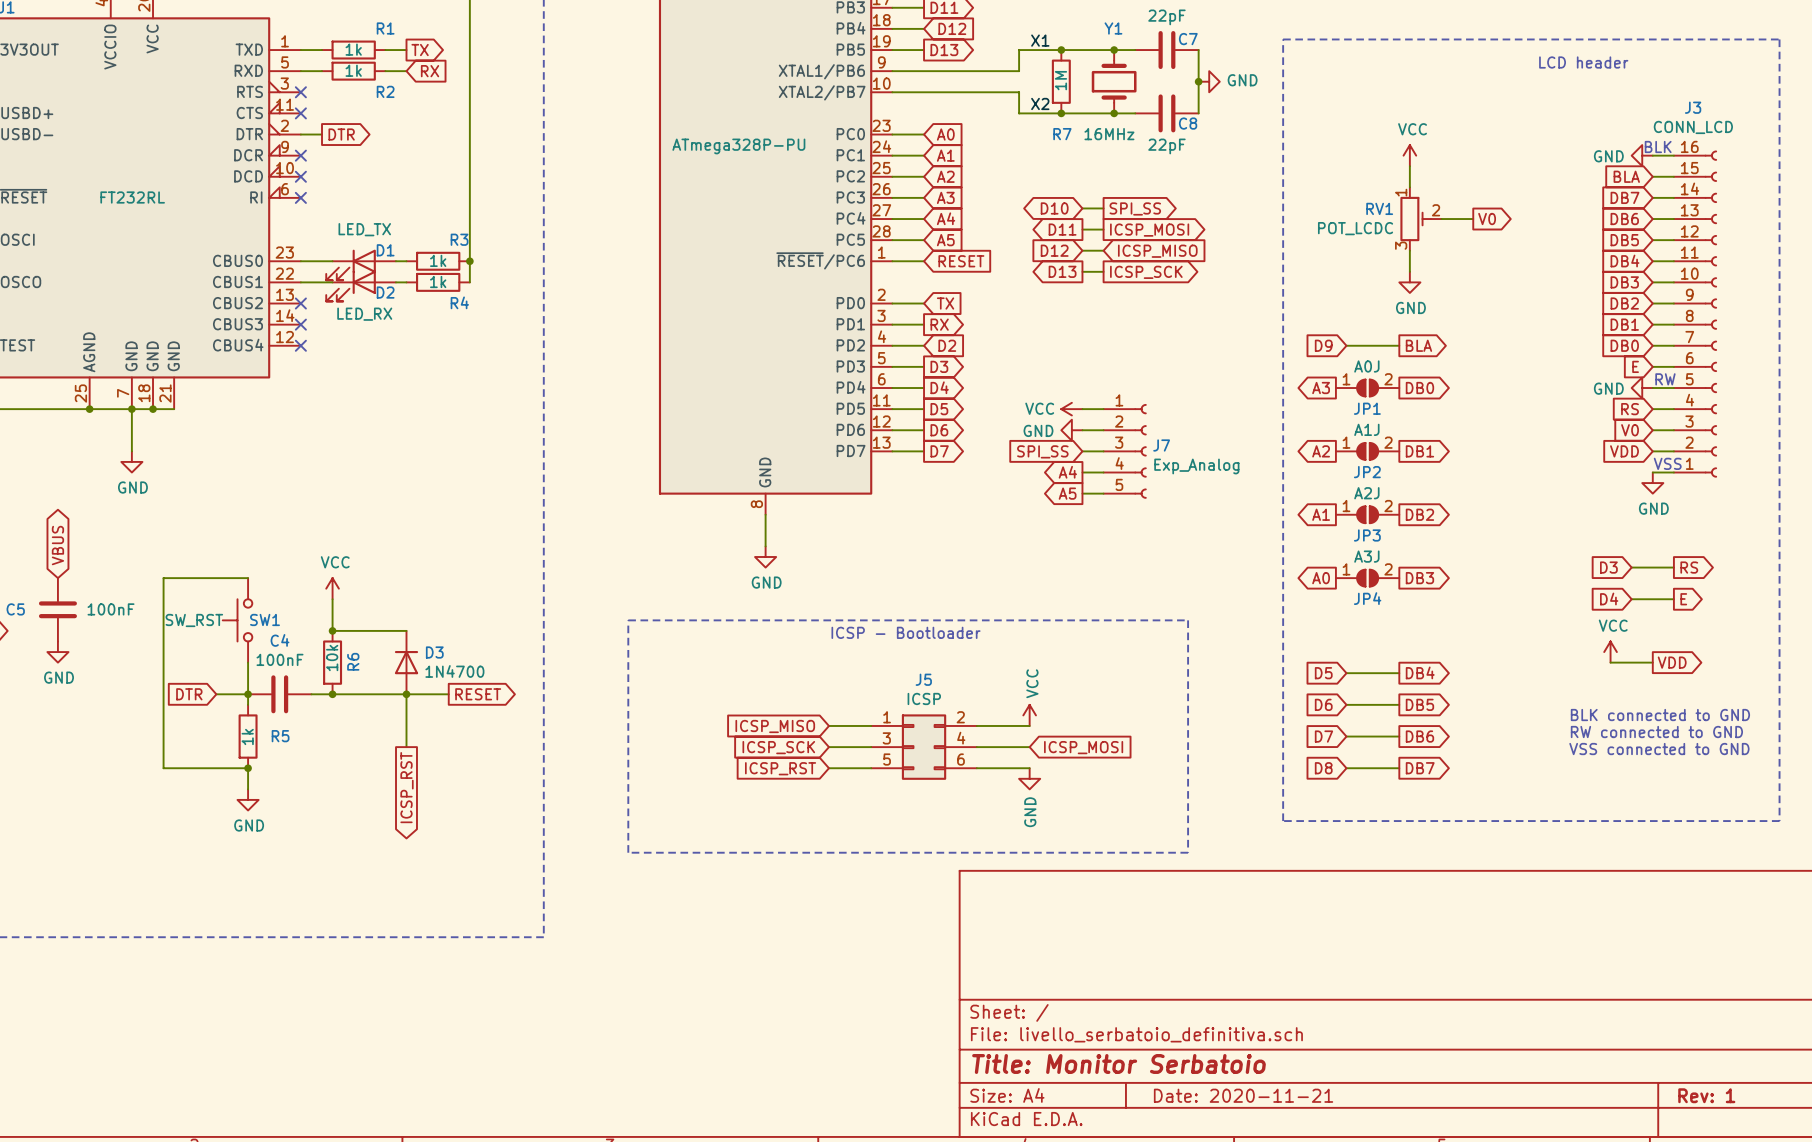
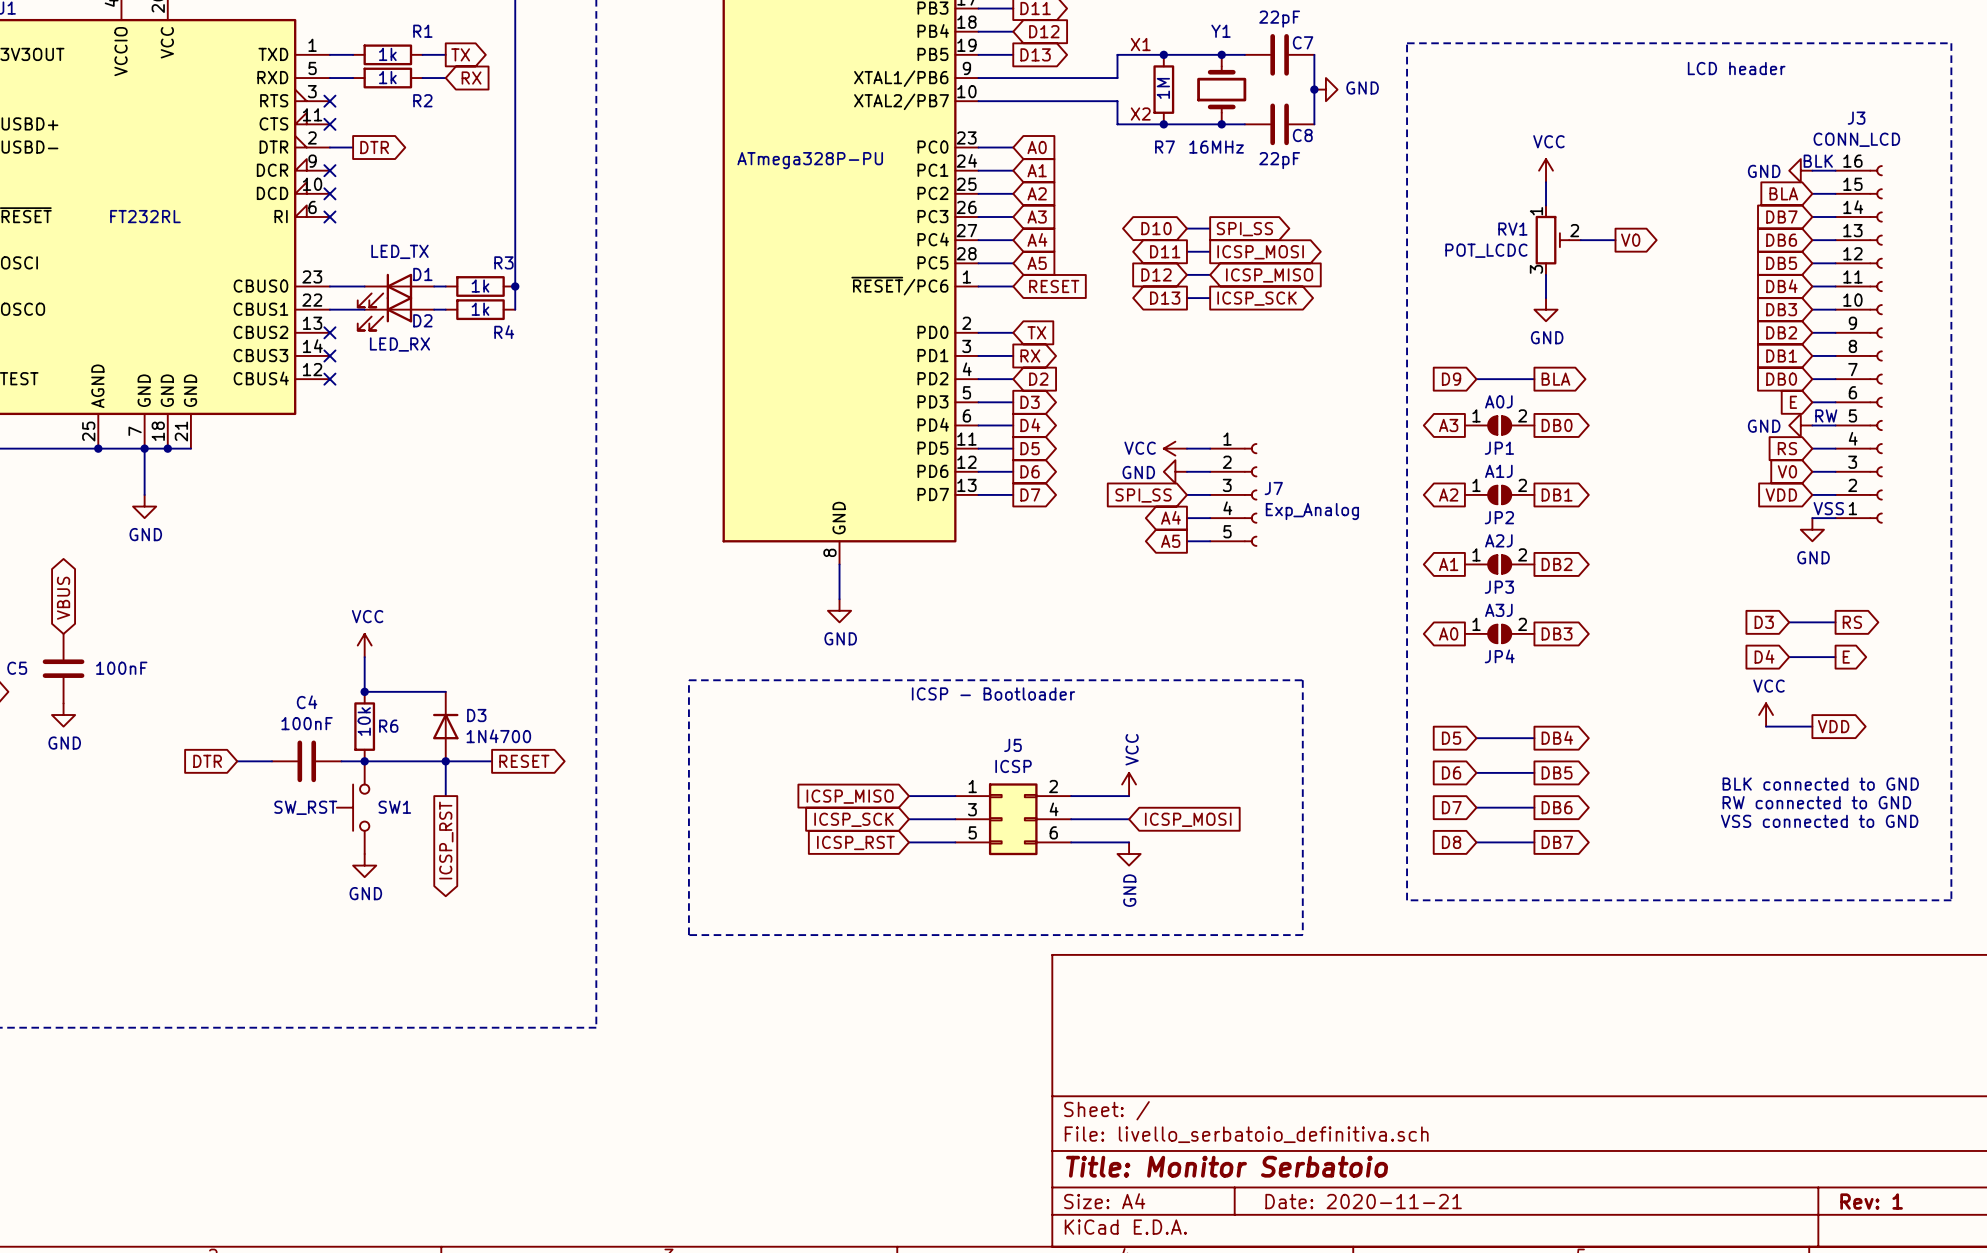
wire: (248, 578) (163, 578) (163, 768) (248, 768) (248, 789) -> none
SW1 name position: SW1 (265, 619) -> SW1 (394, 807)
SW1 position: (237, 620) -> (353, 807)
R6 name rotation: 0° (353, 661) -> 90° clockwise (388, 726)
wire: (248, 662) (248, 704) -> none
junction: (248, 694) -> none
wire: (406, 725) (406, 747) -> none
R5: 1k (248, 736) -> none
junction: (248, 768) -> none
global label position: ICSP_RST (407, 787) -> ICSP_RST (446, 840)
power symbol position: GND (248, 799) -> GND (364, 865)

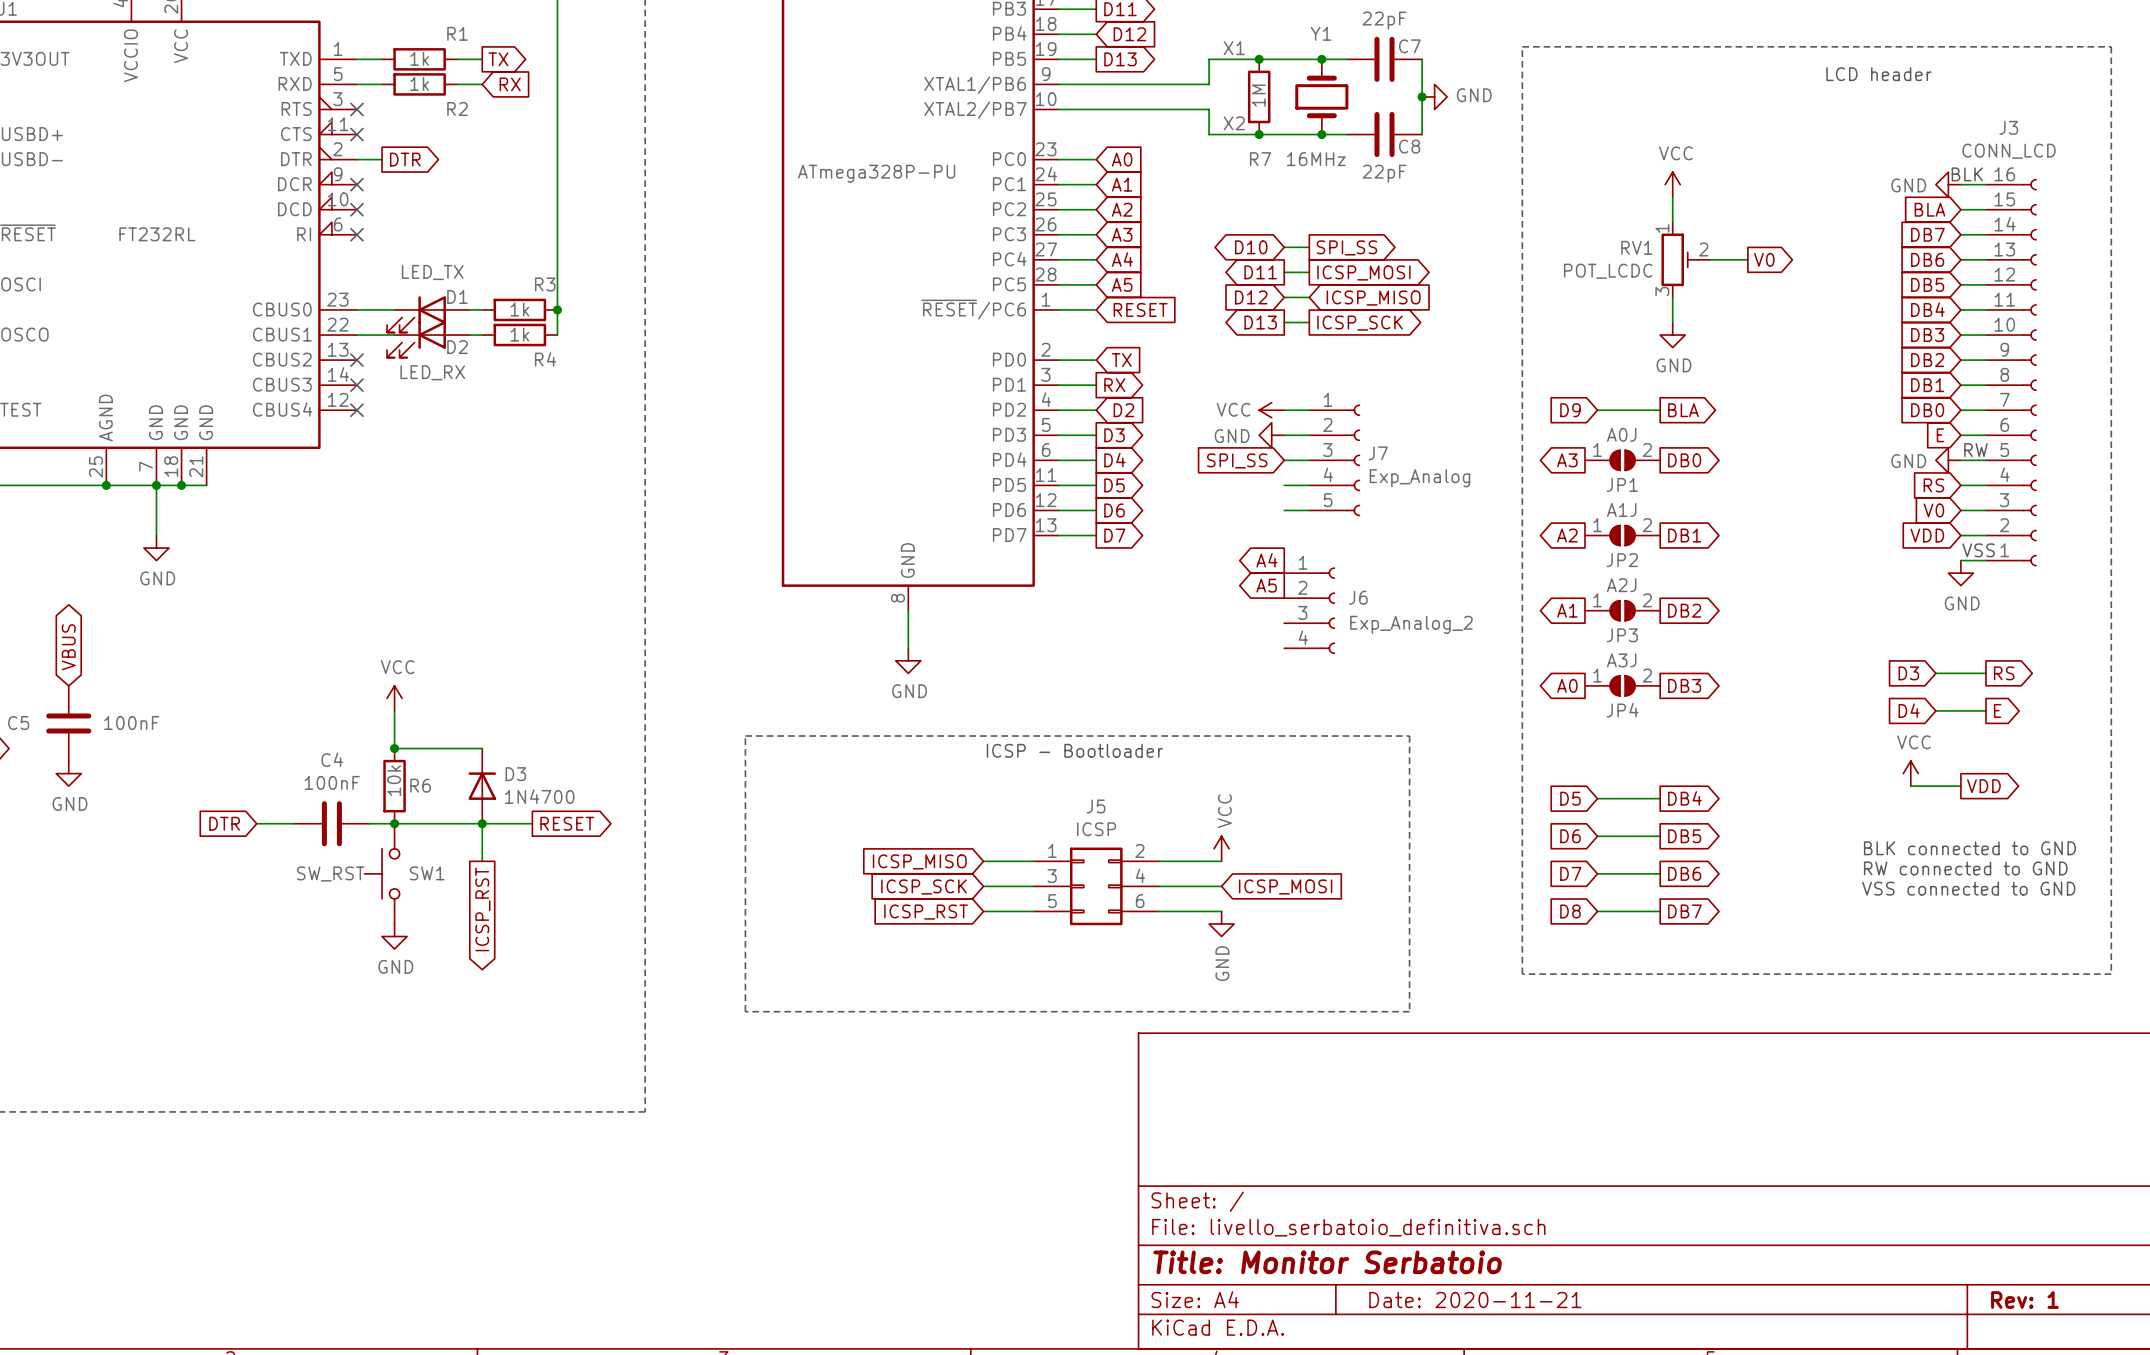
power symbol position: VCC (1175, 448) -> VCC (1271, 410)
power symbol position: GND (1175, 471) -> GND (1271, 435)
wire: (1186, 494) (1210, 494) -> (1284, 410) (1309, 410)
J7 position: (1233, 494) -> (1334, 460)
global label position: SPI_SS (1143, 495) -> SPI_SS (1237, 460)
wire: (1186, 518) (1210, 518) -> (1284, 435) (1309, 435)
wire: (1186, 541) (1210, 541) -> (1284, 460) (1309, 460)
J6: none -> Exp_Analog_2 (1309, 610)

